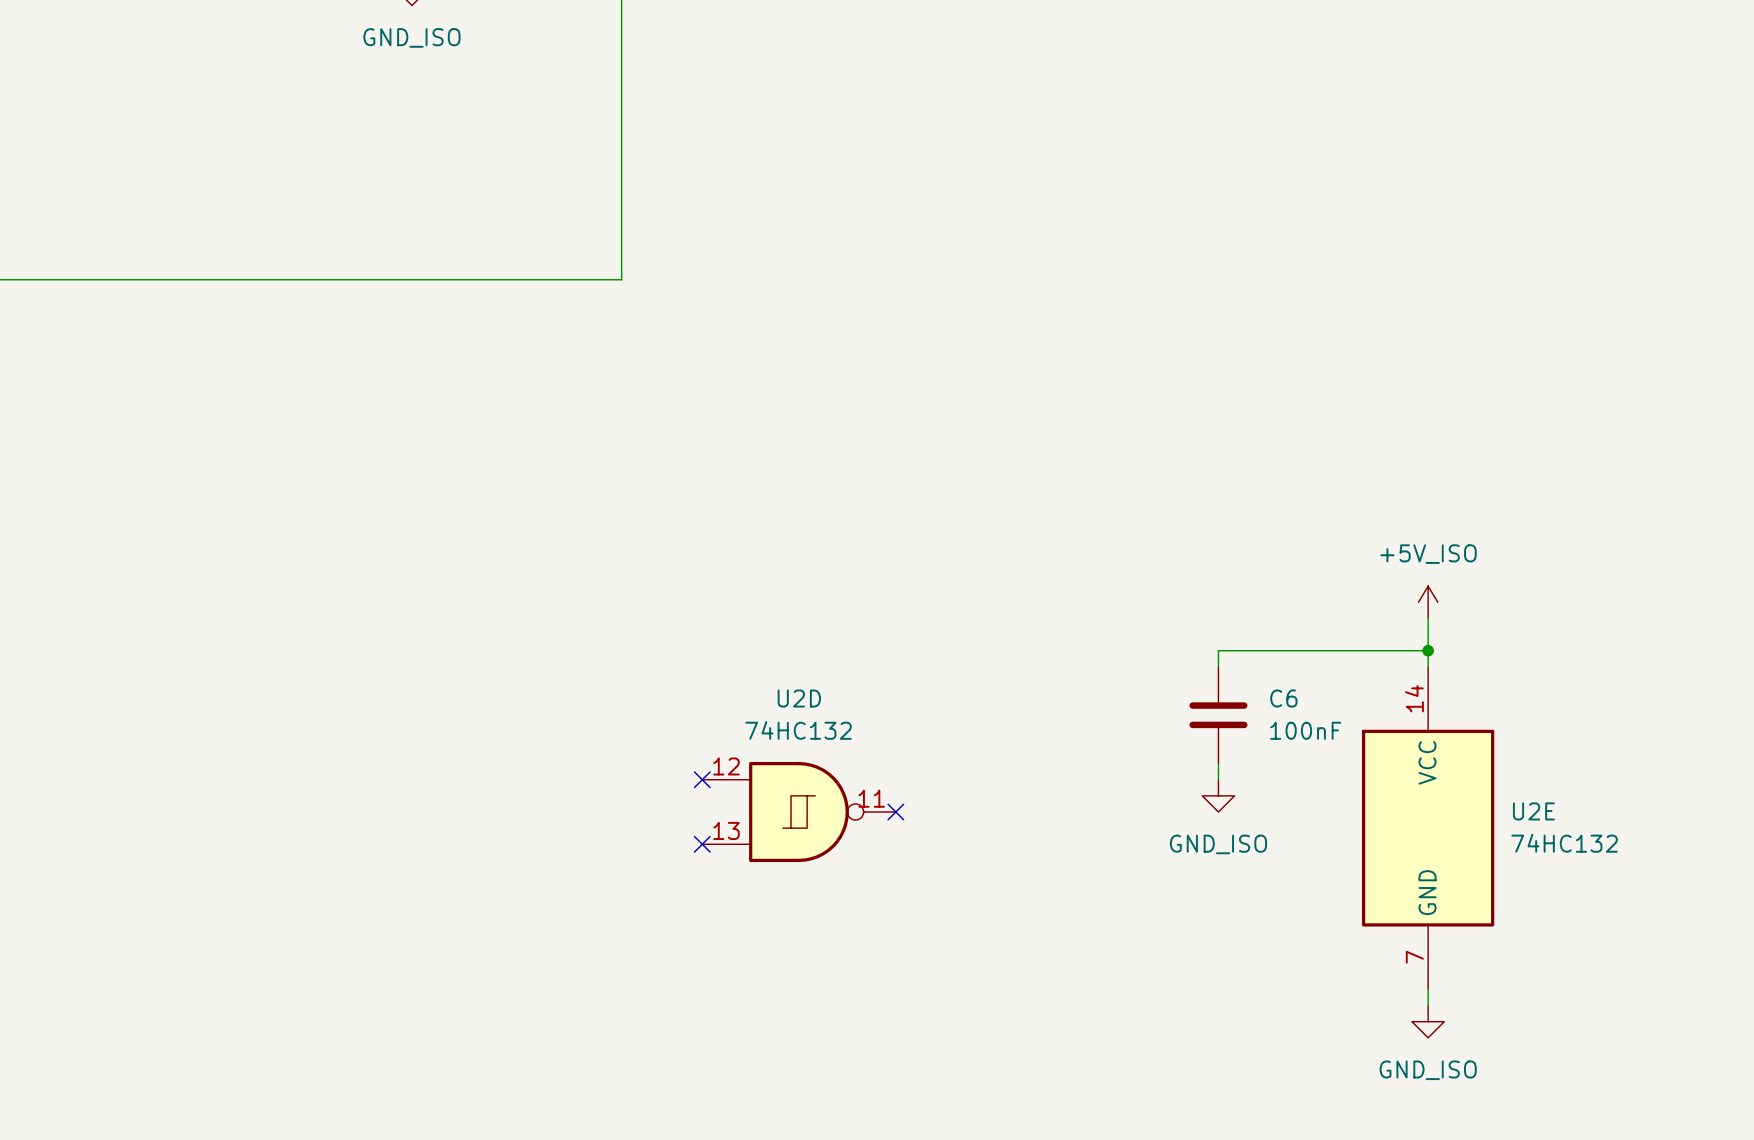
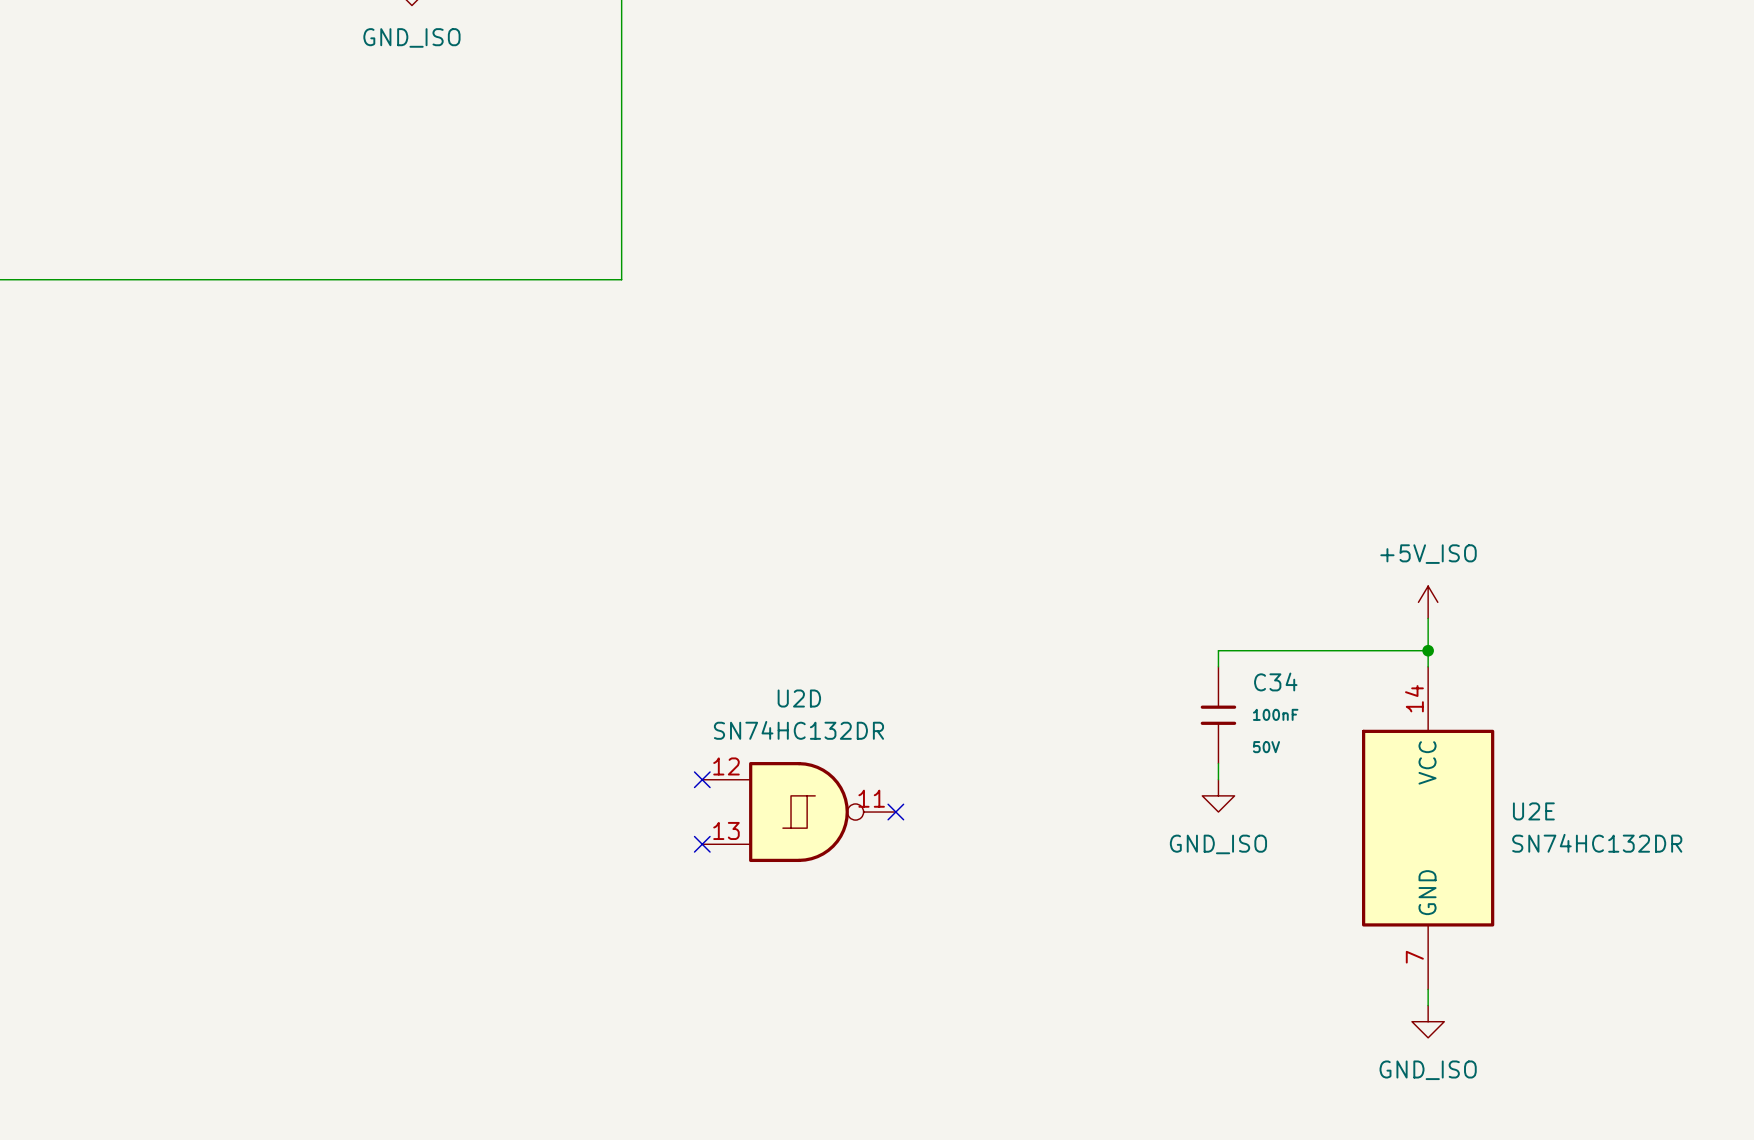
C6: 100nF (1218, 715) -> none
C34: none -> 100nF (1218, 715)
U2D value: 74HC132 (798, 730) -> SN74HC132DR (798, 730)
U2E value: 74HC132 (1564, 843) -> SN74HC132DR (1597, 843)

